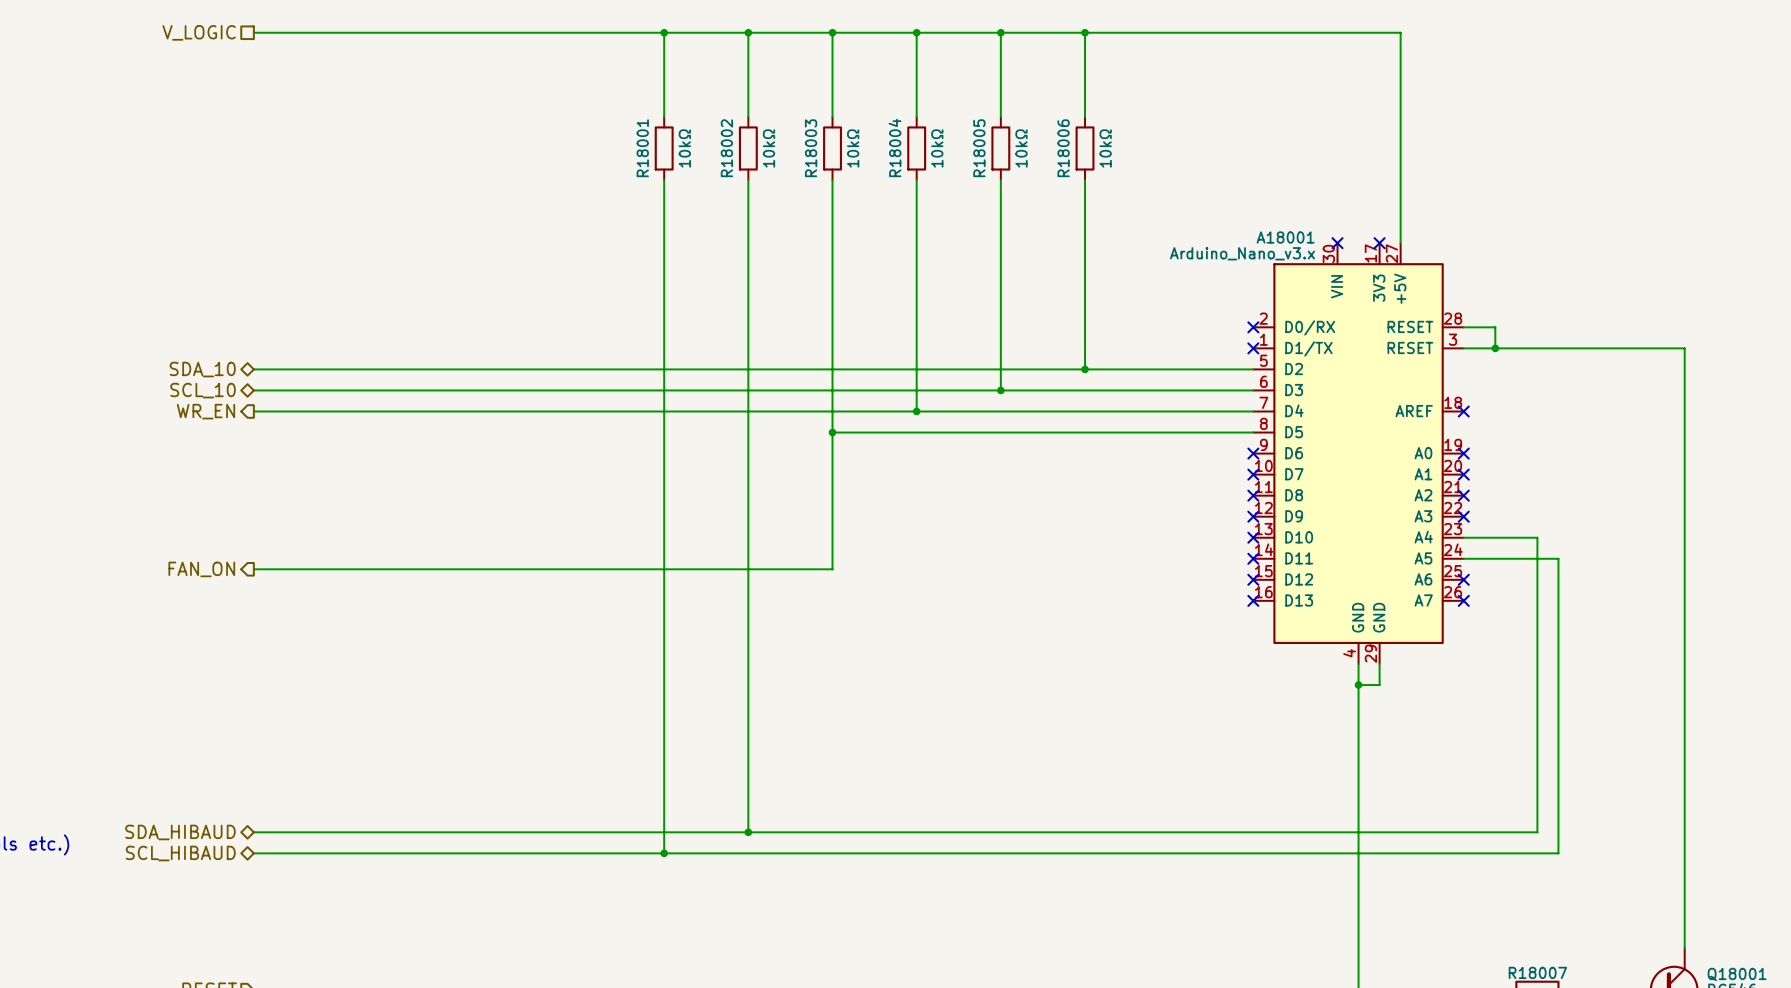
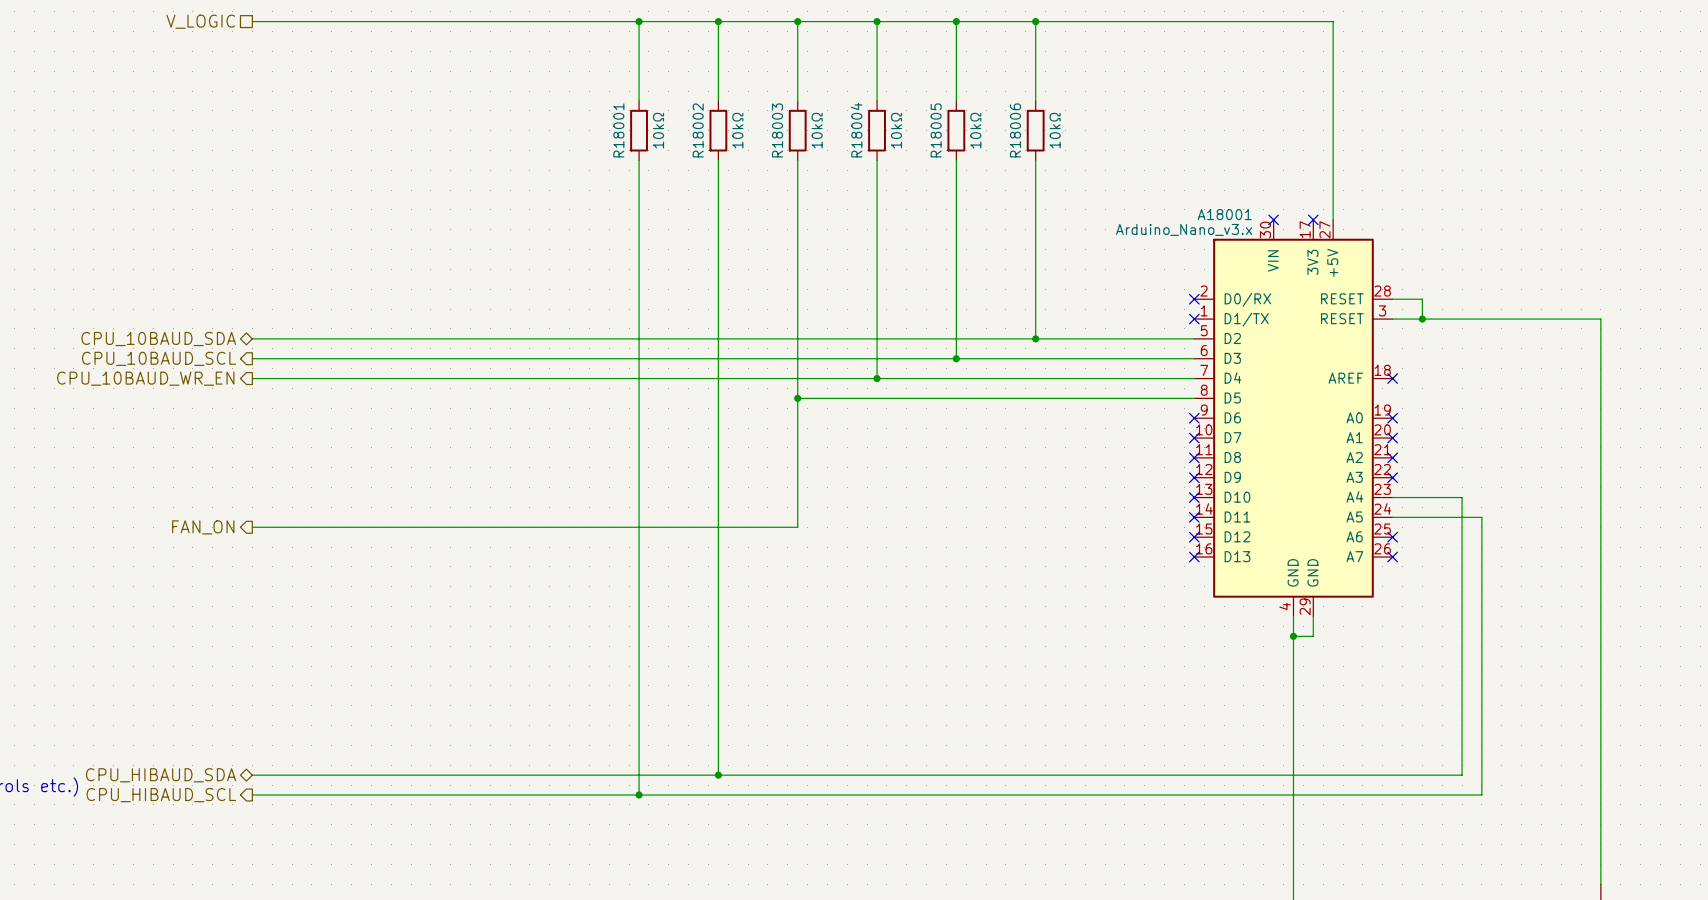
hierarchical label: SDA_10 (202, 369) -> CPU_10BAUD_SDA (158, 339)
hierarchical label shape: bidirectional (202, 390) -> output (159, 358)
hierarchical label: SCL_10 (202, 390) -> CPU_10BAUD_SCL (159, 358)
hierarchical label: WR_EN (206, 411) -> CPU_10BAUD_WR_EN (145, 378)
hierarchical label: SDA_HIBAUD (180, 832) -> CPU_HIBAUD_SDA (161, 775)
hierarchical label shape: bidirectional (180, 853) -> output (161, 795)
hierarchical label: SCL_HIBAUD (180, 853) -> CPU_HIBAUD_SCL (161, 795)

